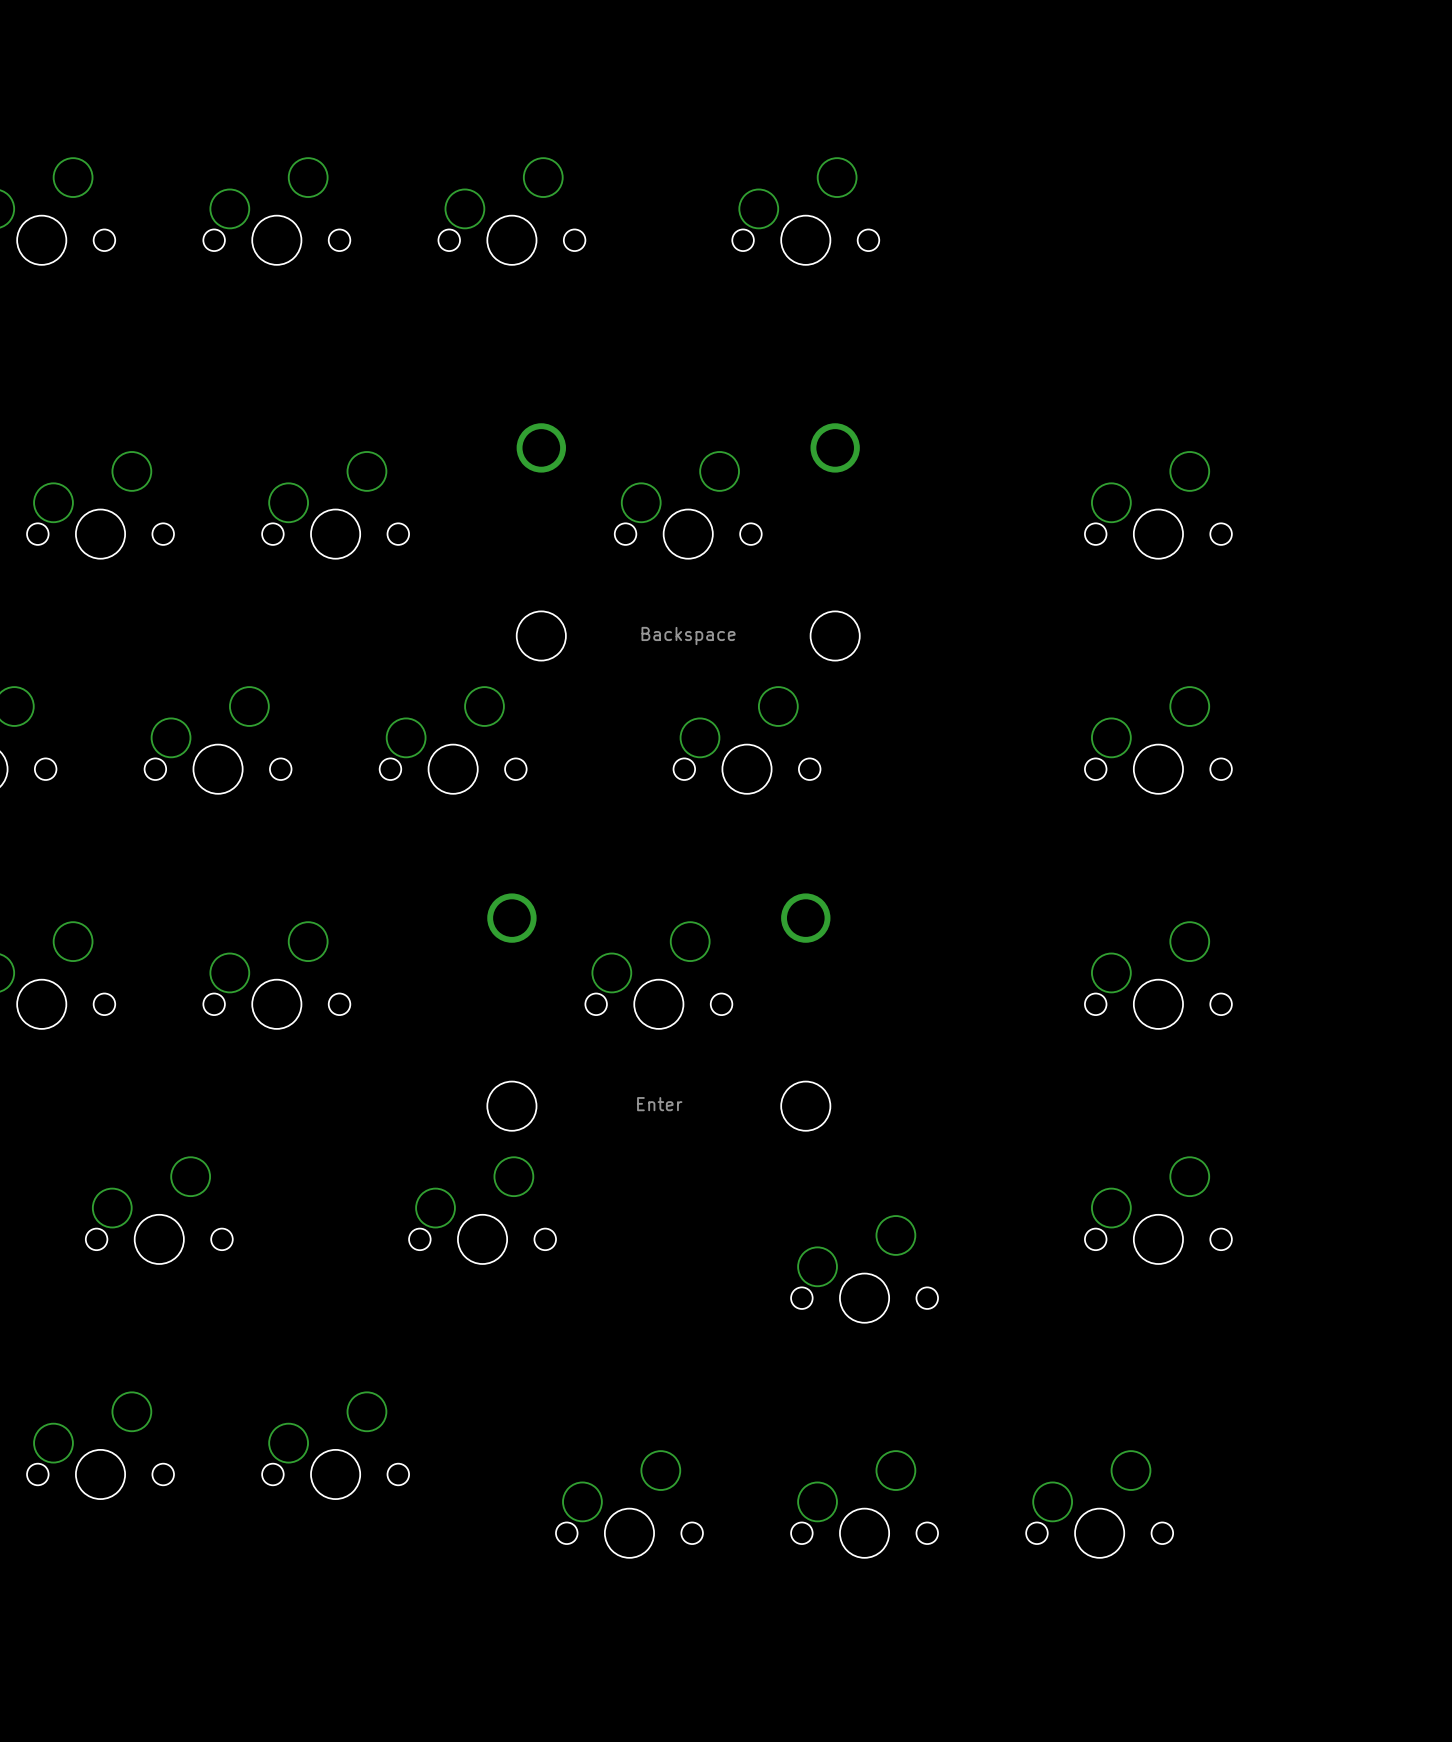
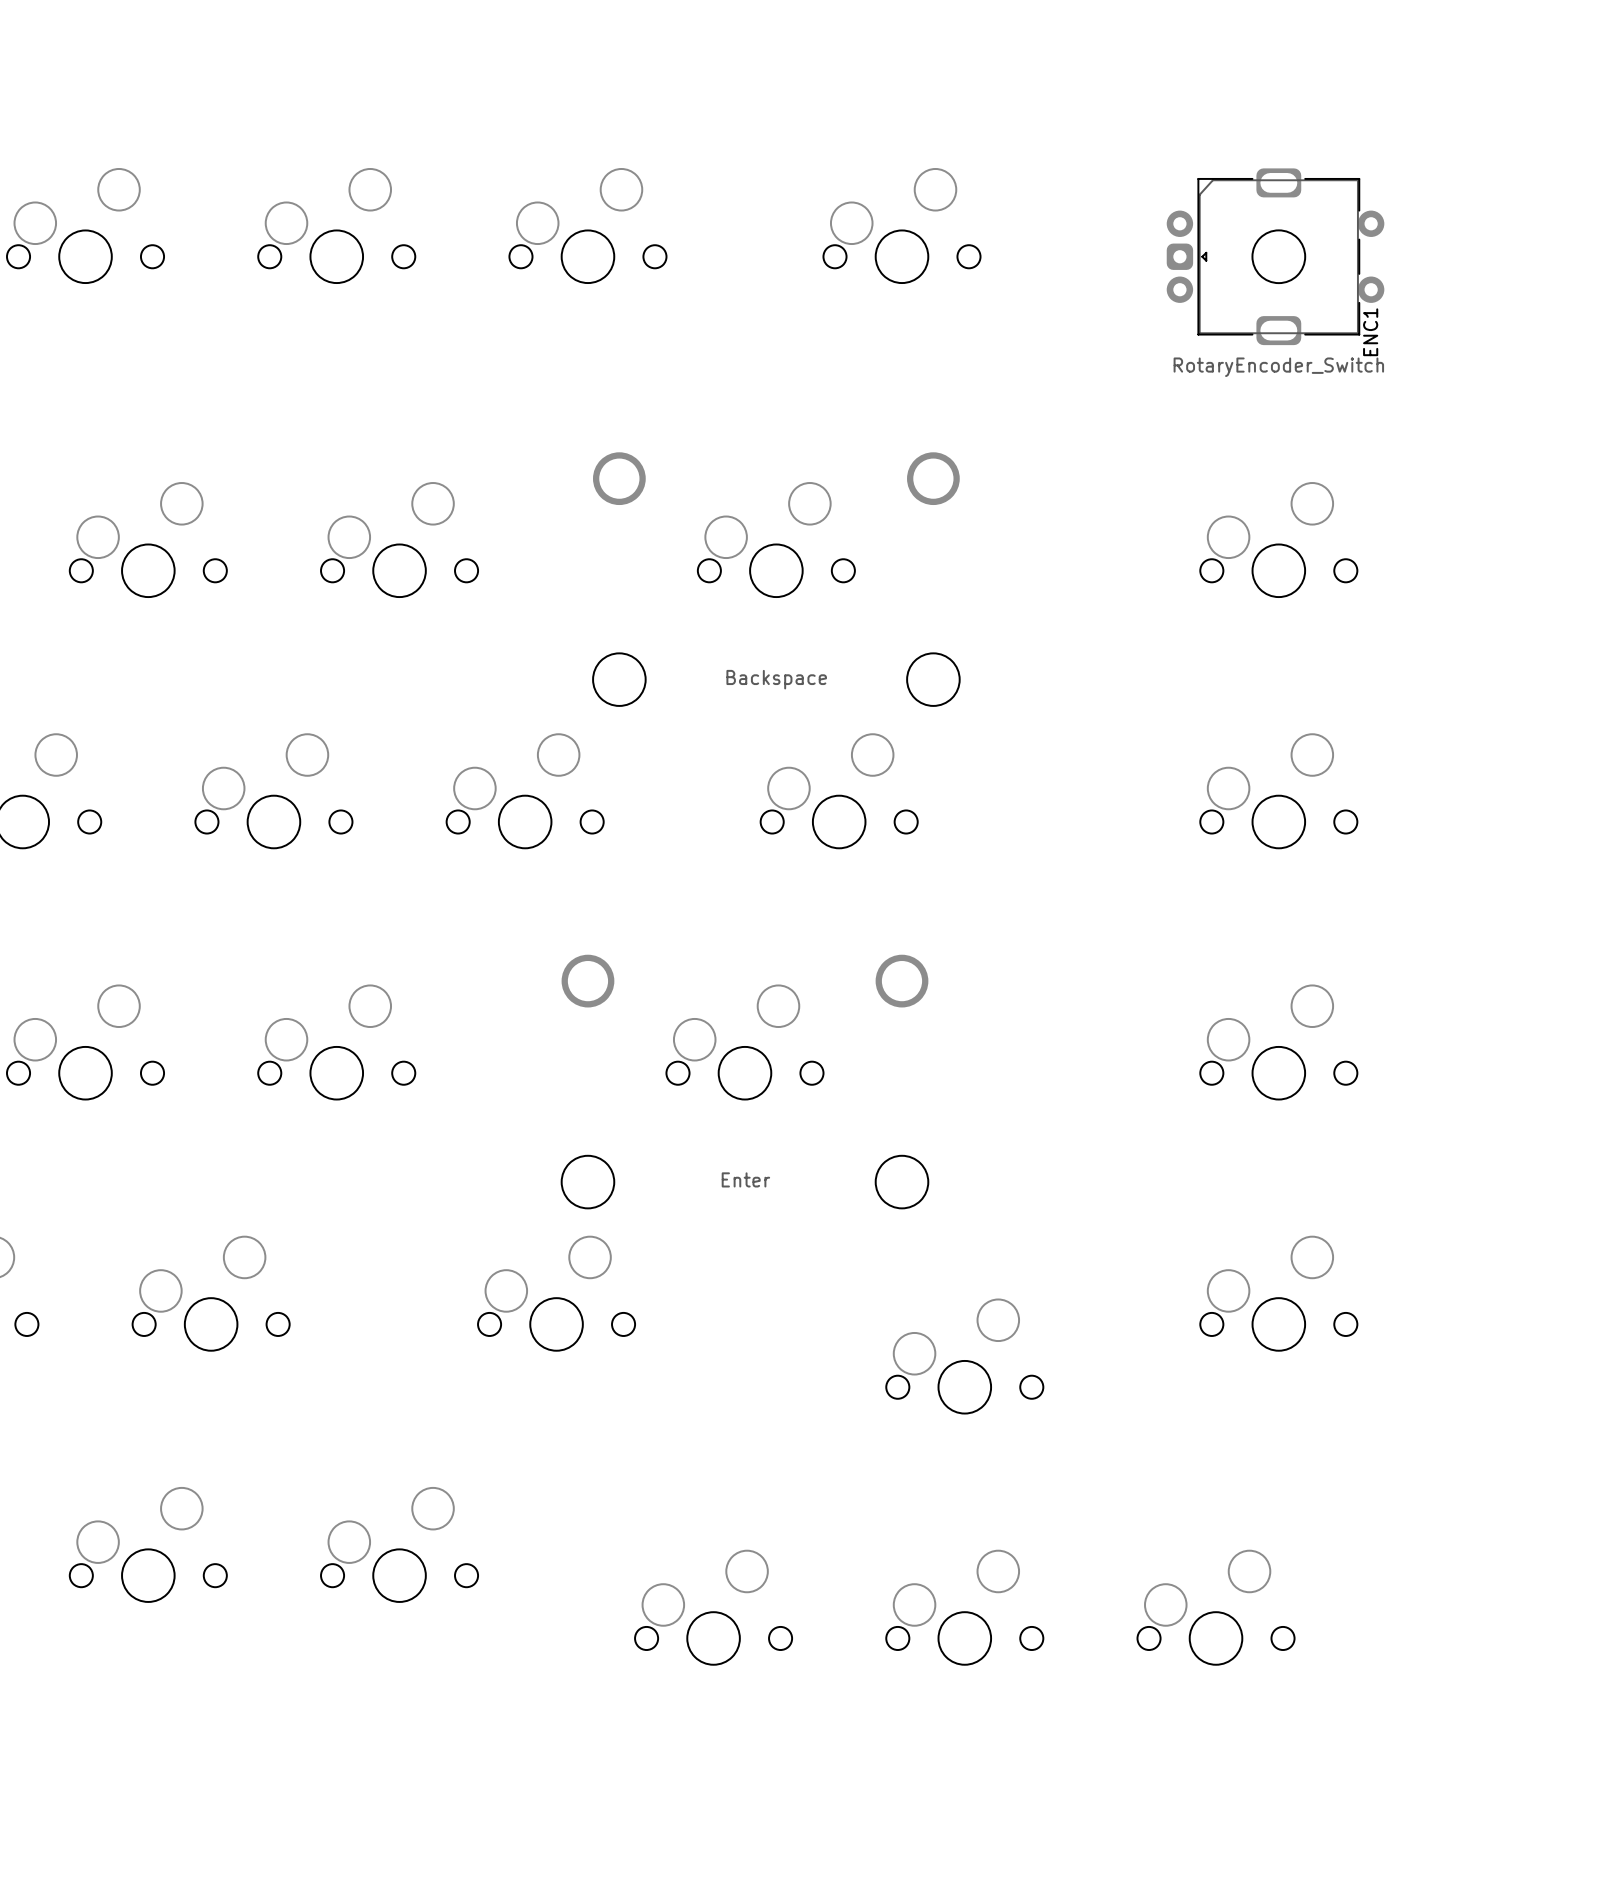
ENC1: none -> RotaryEncoder_Switch (1275, 256)

